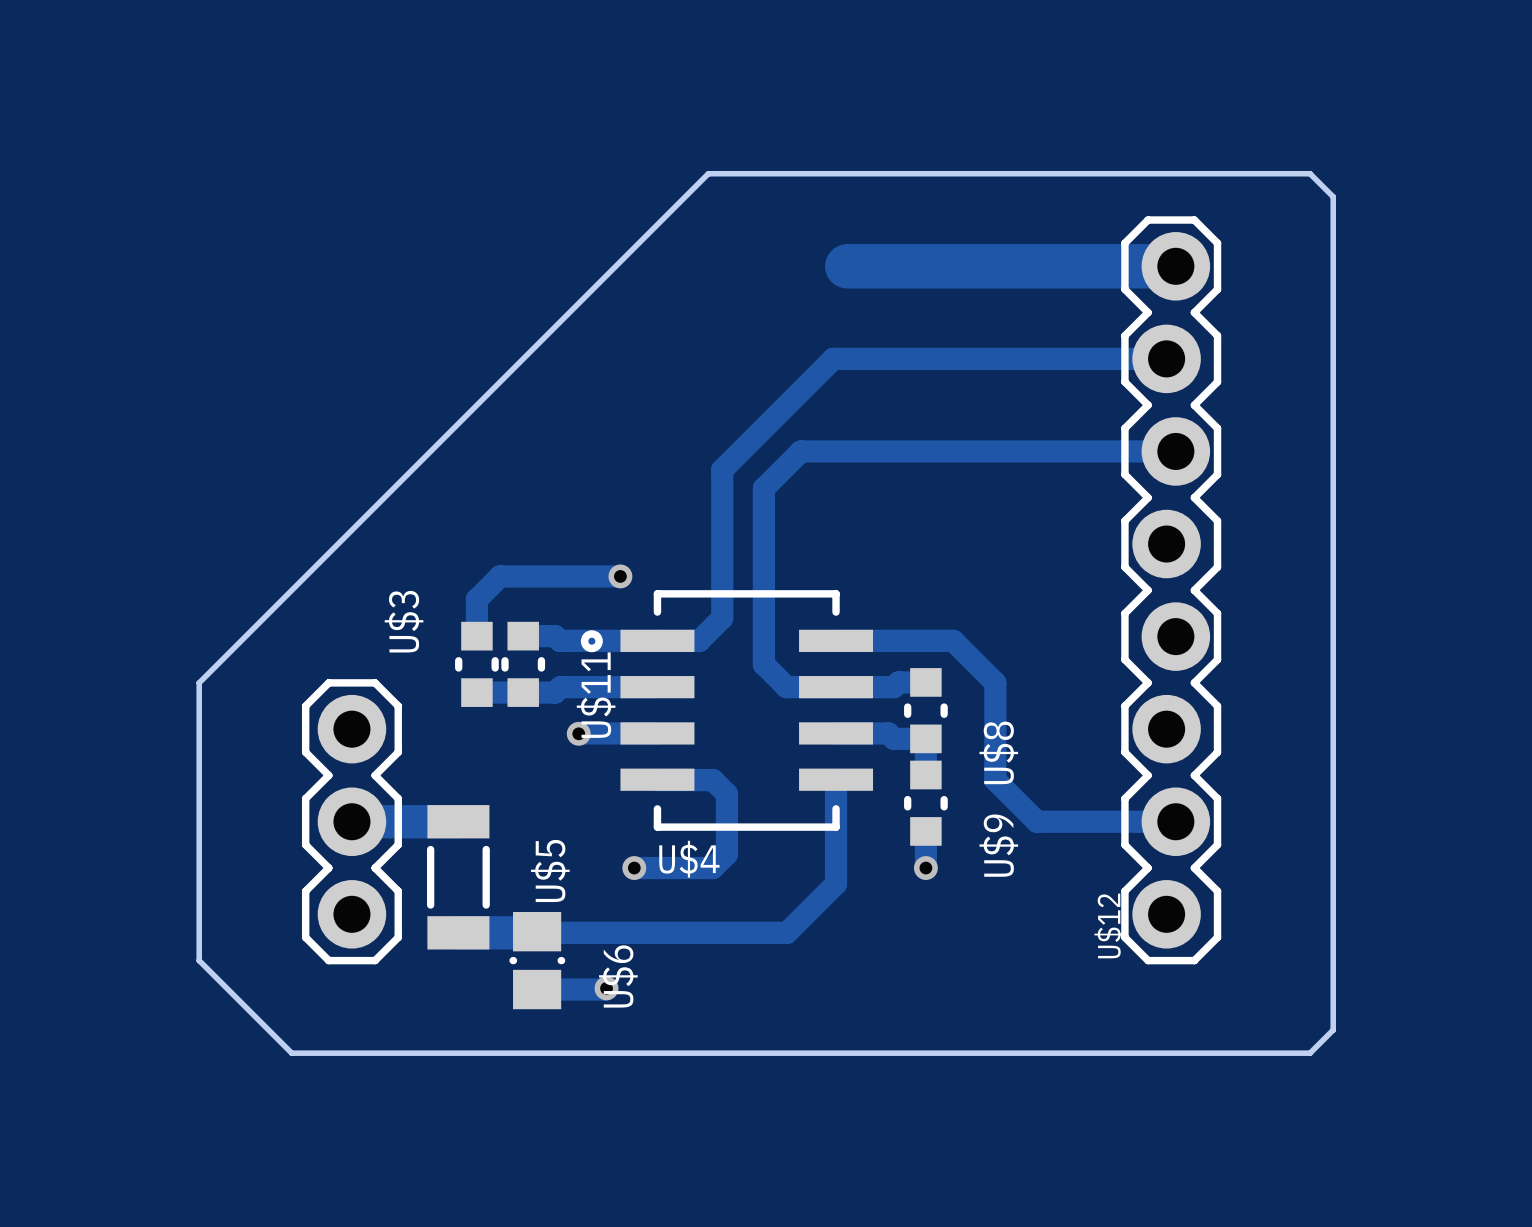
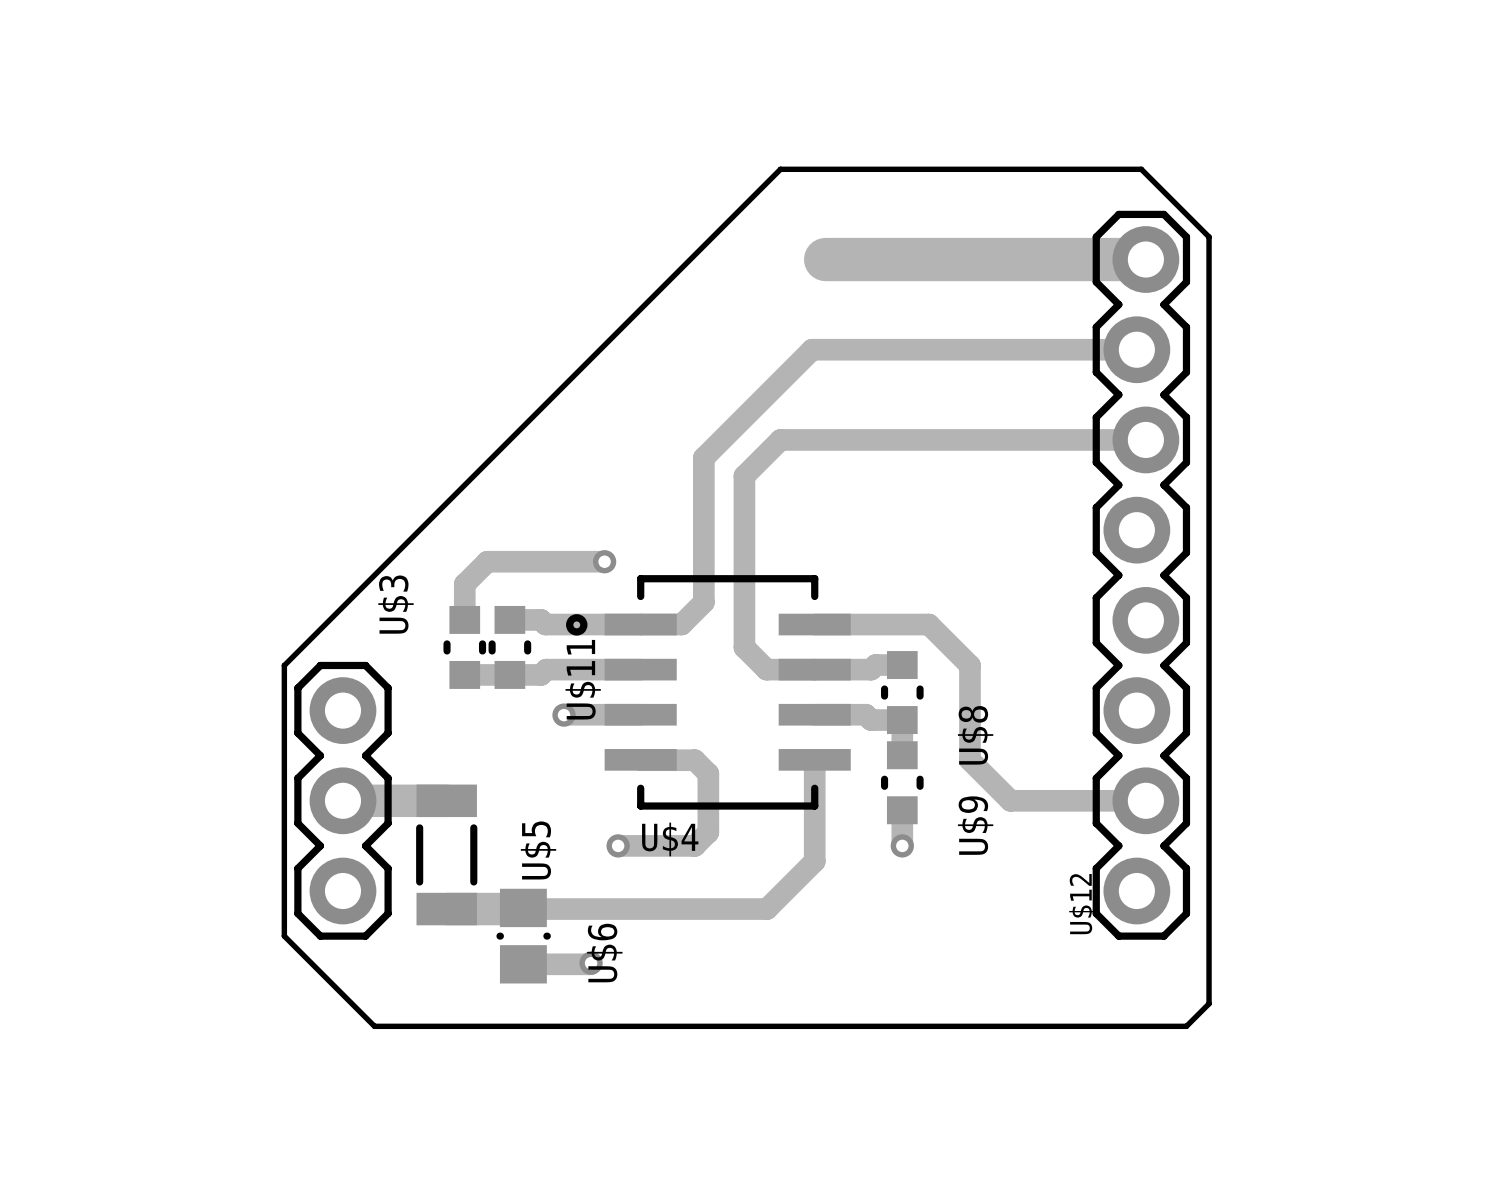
board edge: (800, 173) (708, 173) (199, 682) (199, 960) (291, 1053) (384, 1053) -> (780, 169) (284, 665) (284, 936) (374, 1026)
board edge: (1171, 173) (1310, 173) (1333, 196) (1333, 1030) (1310, 1053) (1217, 1053) -> (1141, 169) (1209, 236) (1209, 1003) (1186, 1026)

